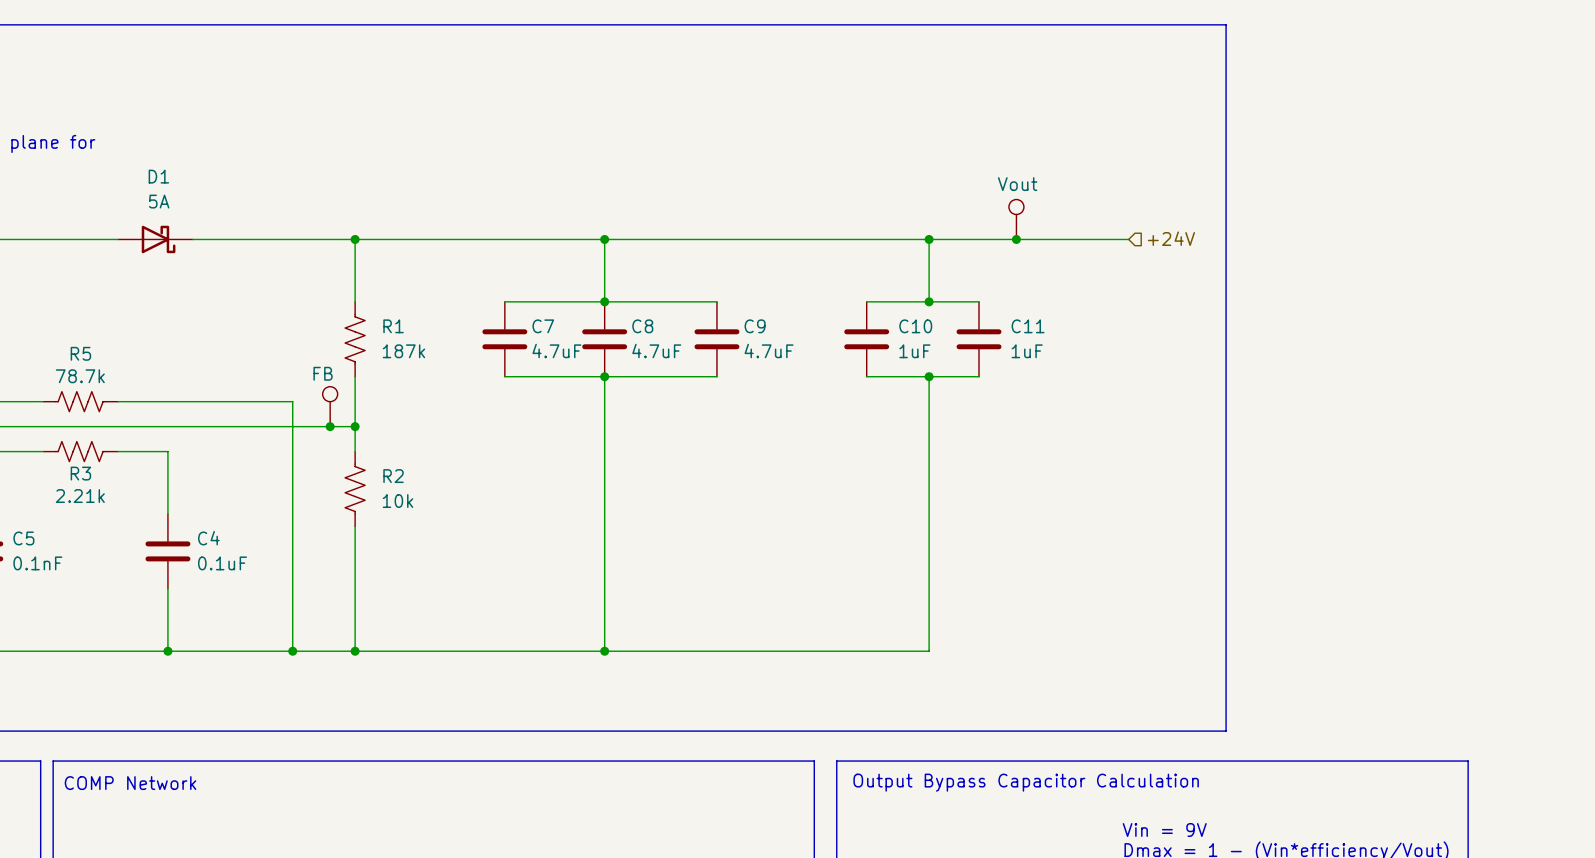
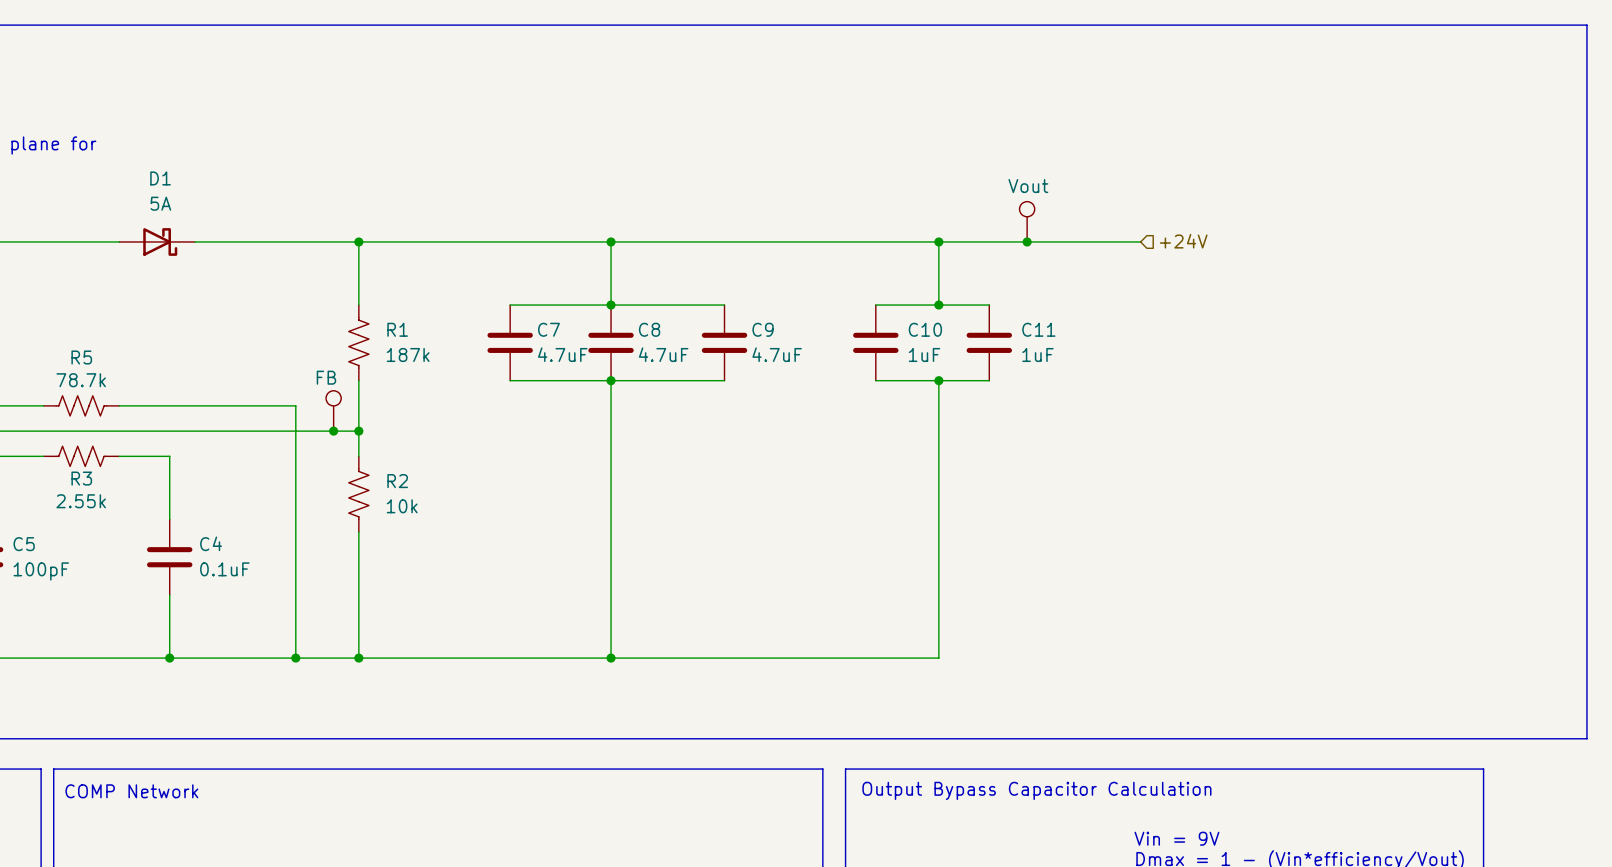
line: (1226, 24) (1226, 731) -> (1238, 25) (1586, 25) (1586, 738) (1238, 738)
R3 value: 2.21k (80, 496) -> 2.55k (81, 501)
C5 value: 0.1nF (37, 563) -> 100pF (41, 571)

